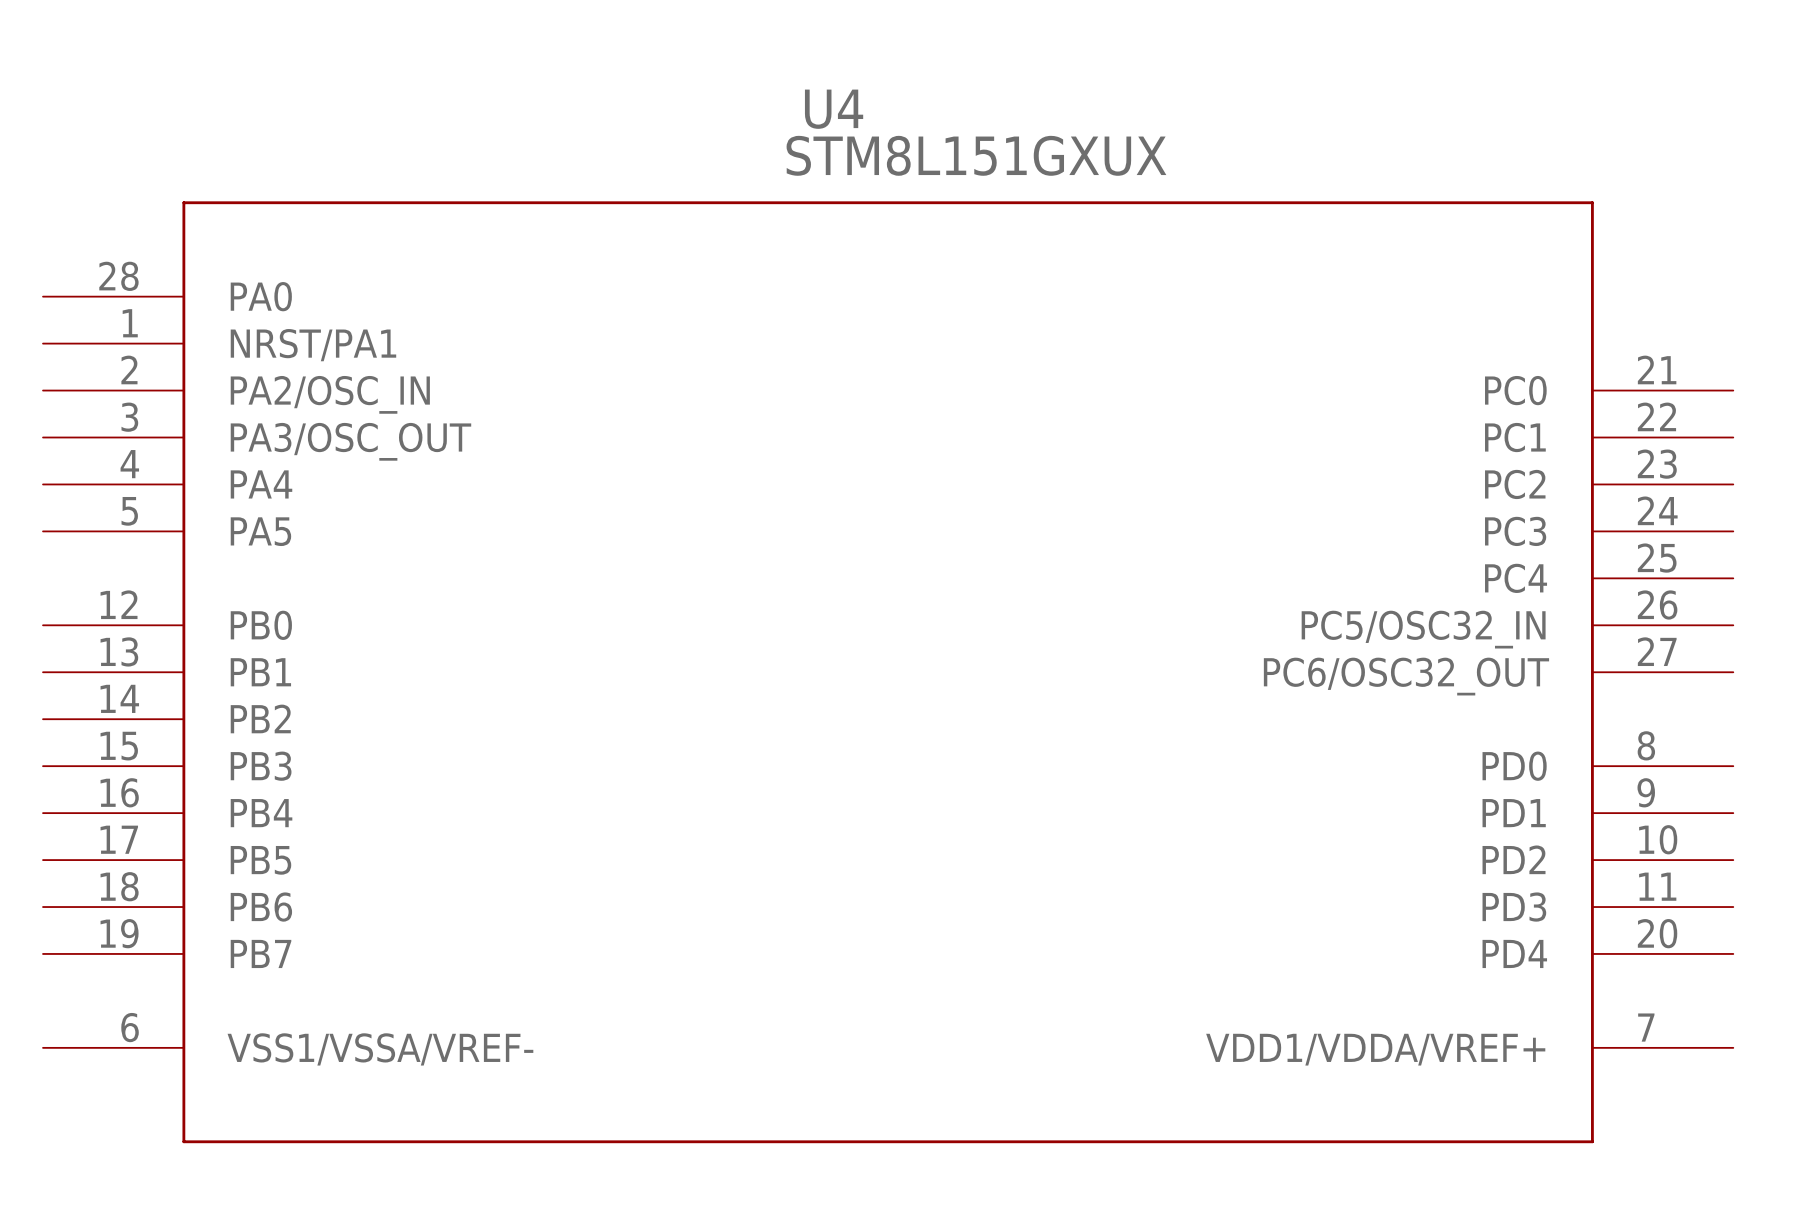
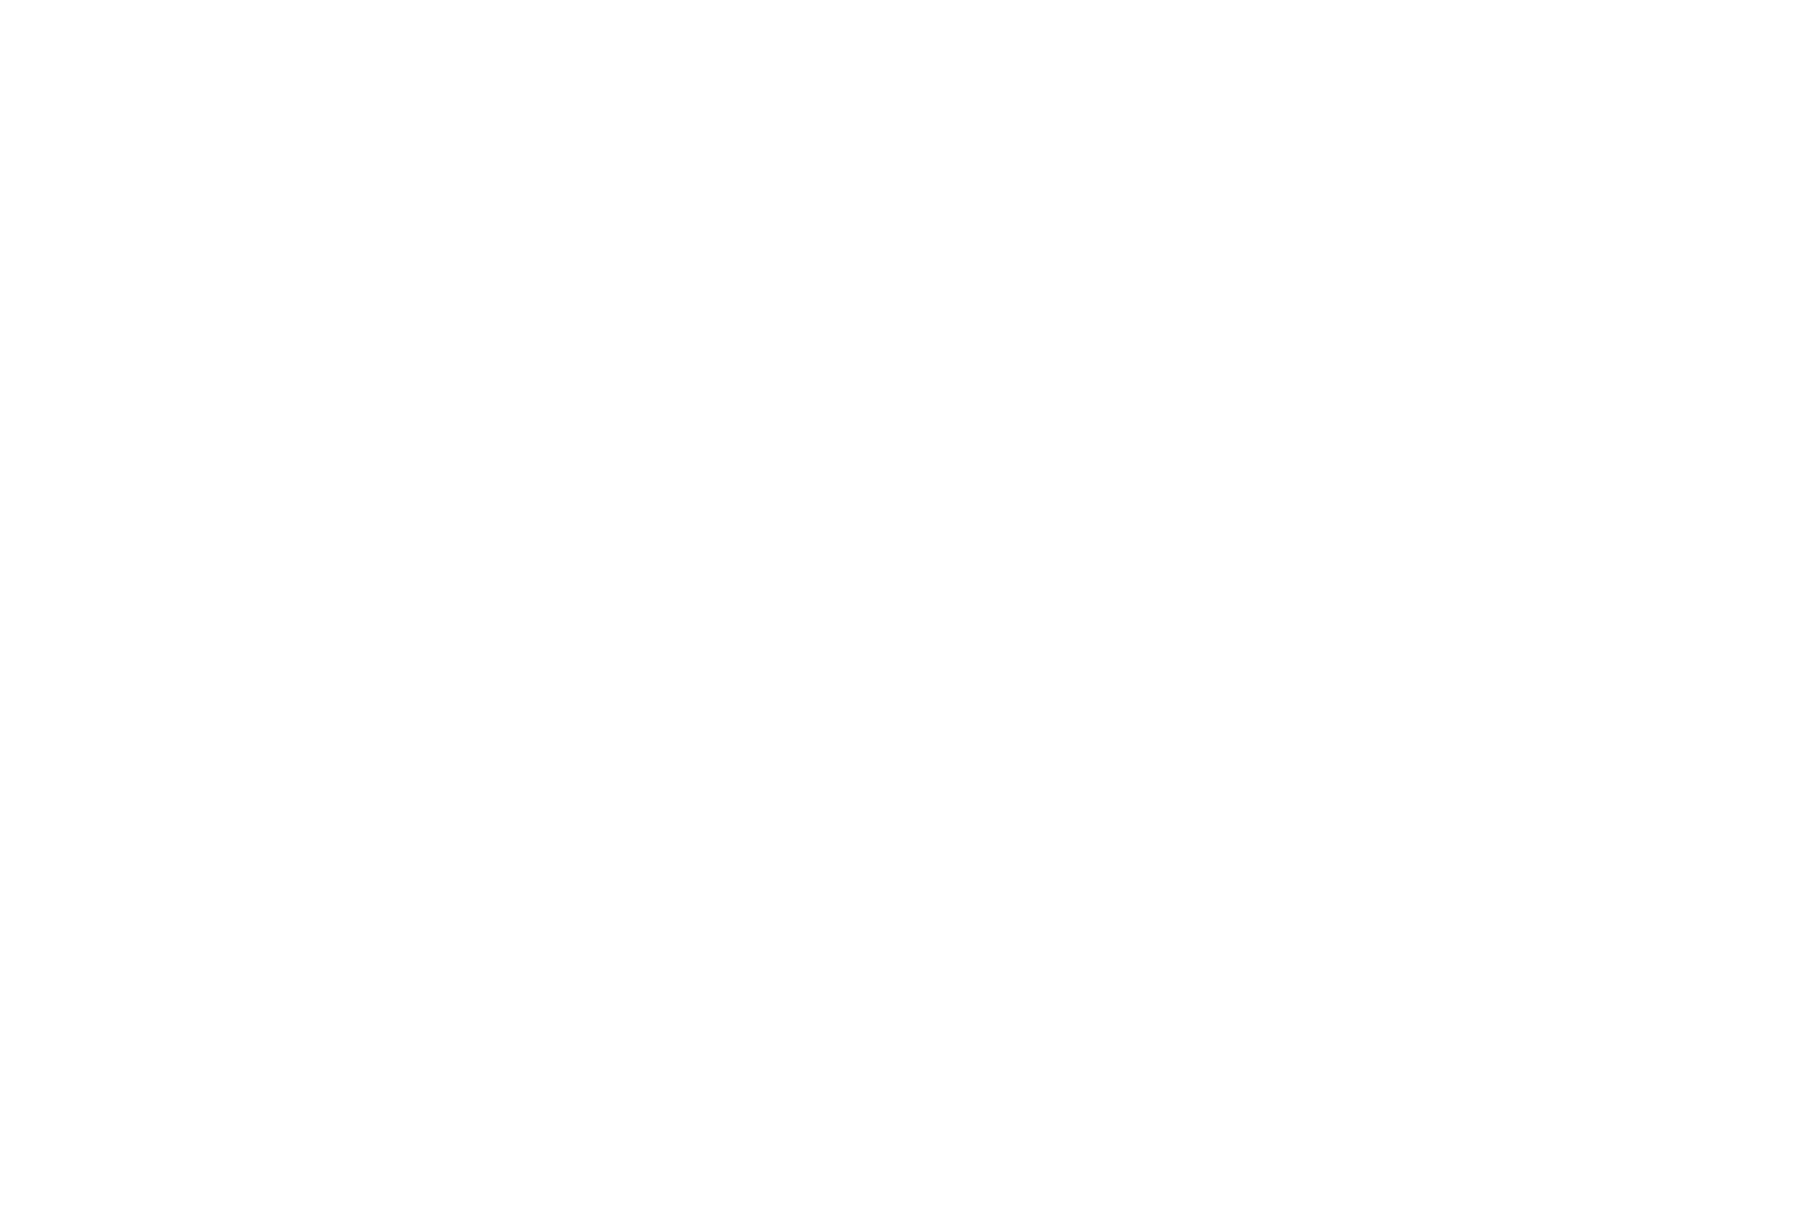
U4: STM8L151GXUX (888, 672) -> none

